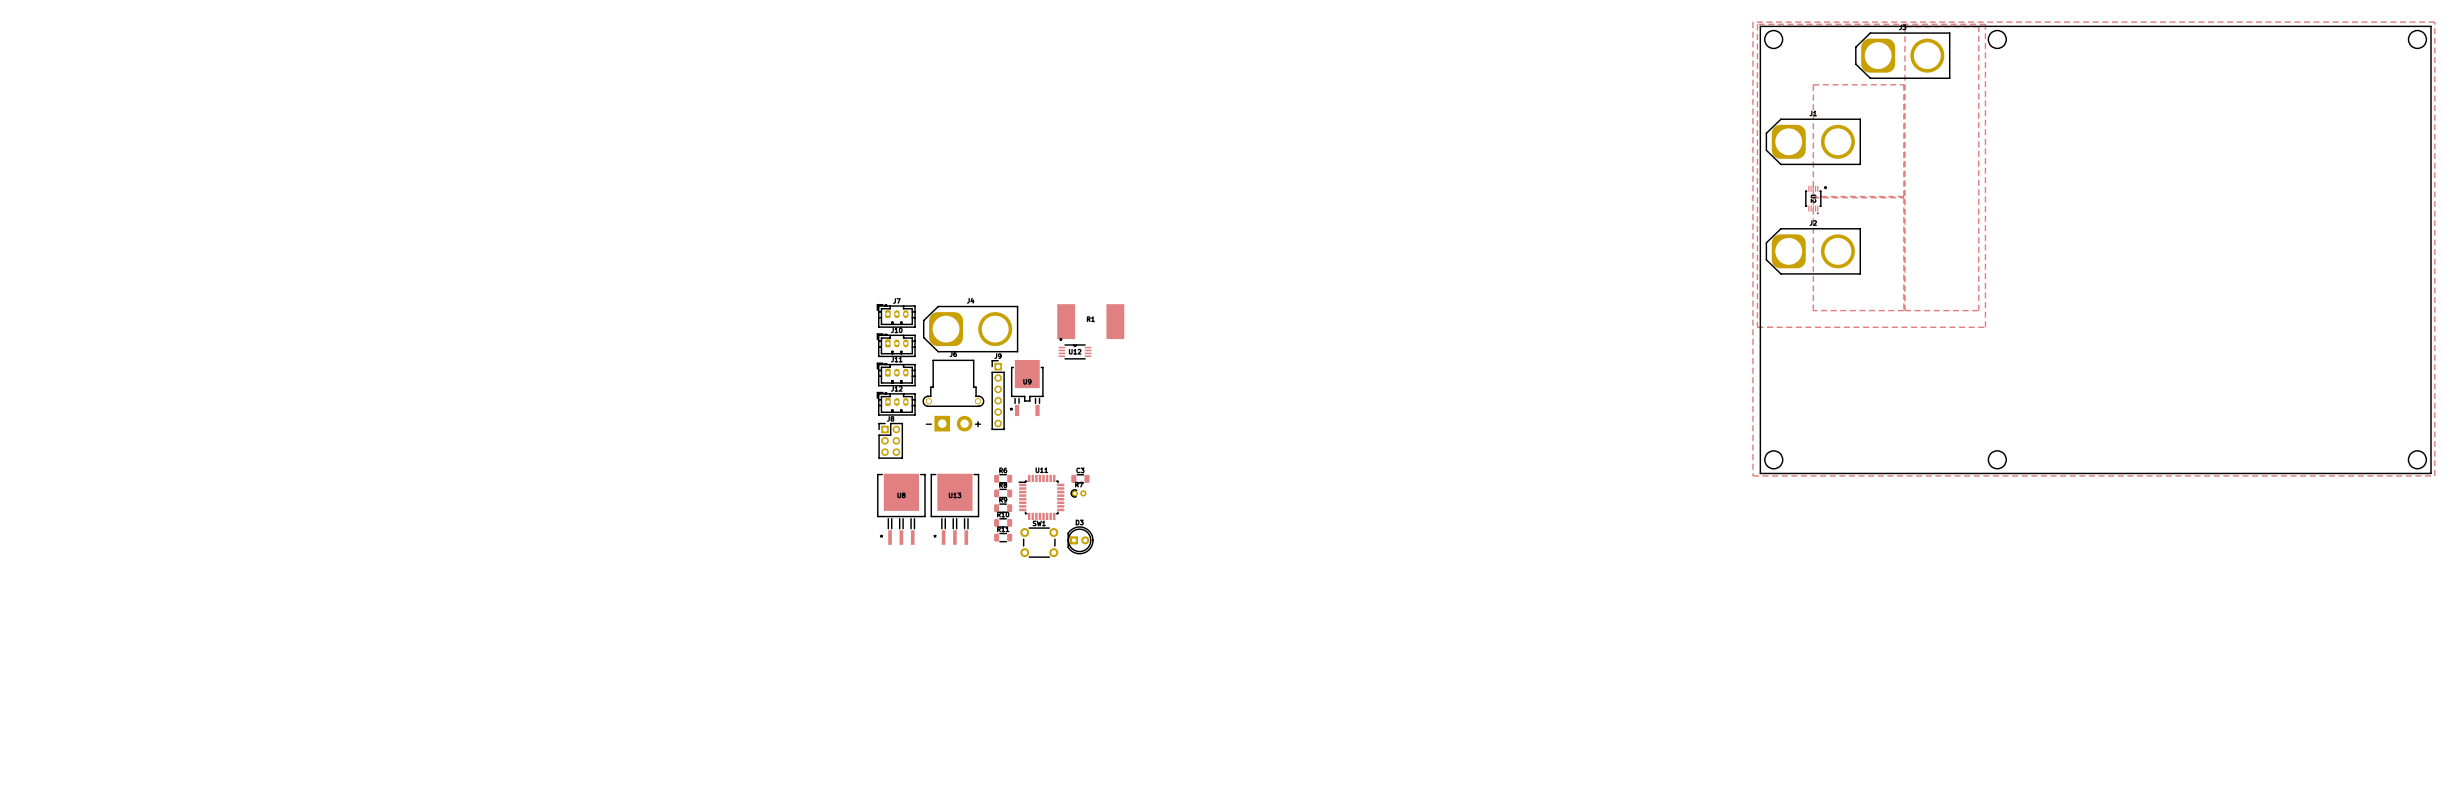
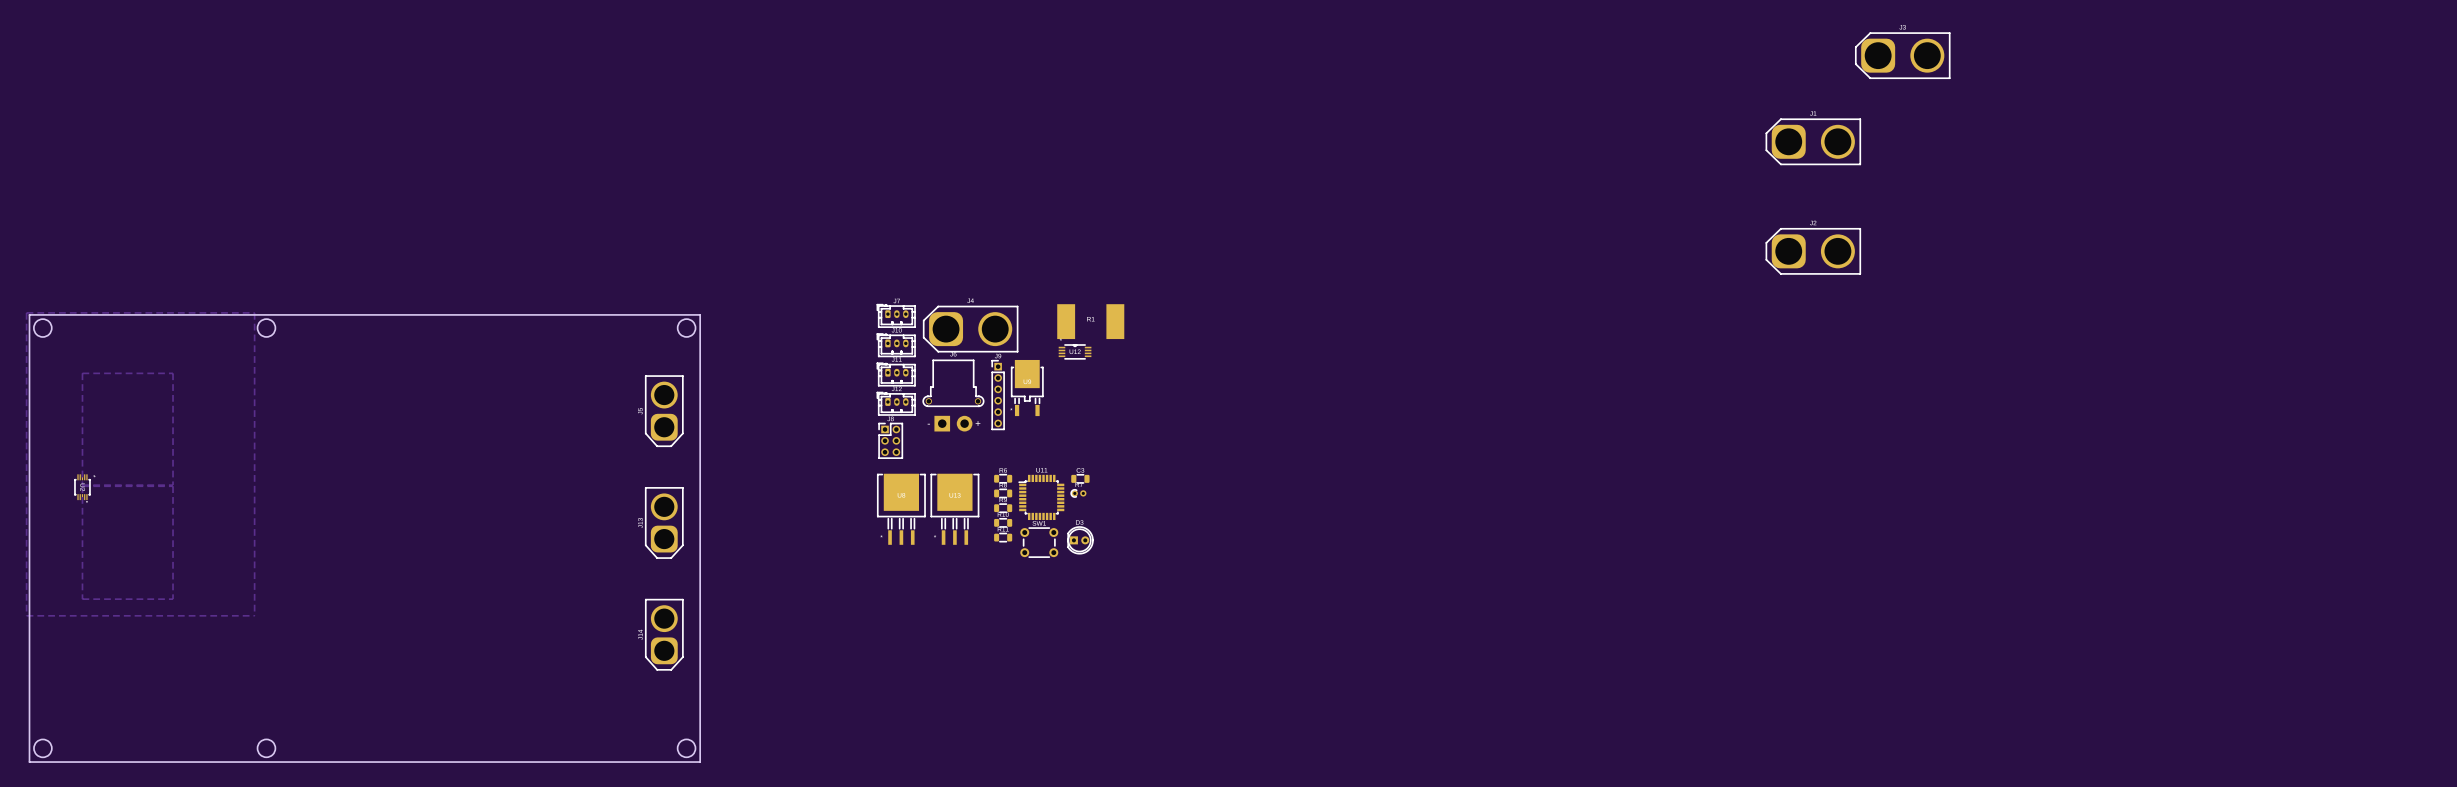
zone outline: (1752, 22) (2434, 22) (2434, 475) (1752, 475) (1752, 22) -> none
zone outline: (1757, 24) (1985, 24) (1985, 327) (1757, 327) (1757, 24) -> none
board edge: (1760, 26) (1760, 473) (2431, 473) (2431, 26) (1760, 26) -> none
zone outline: (1904, 26) (1904, 310) (1978, 310) (1978, 26) (1904, 26) -> none
round board edge: [1764, 30, 1783, 49] -> none
round board edge: [1988, 30, 2007, 49] -> none
round board edge: [2408, 30, 2427, 49] -> none
zone outline: (1813, 84) (1813, 196) (1903, 196) (1903, 84) (1813, 84) -> none
zone outline: (1813, 197) (1903, 197) (1903, 310) (1813, 310) (1813, 197) -> none
part position: (1813, 199) -> (82, 488)
zone outline: none -> (26, 312) (254, 312) (254, 615) (26, 615) (26, 312)
board edge: none -> (29, 314) (29, 762) (700, 762) (700, 314) (29, 314)
round board edge: none -> [33, 318, 52, 338]
round board edge: none -> [257, 318, 276, 338]
round board edge: none -> [677, 318, 696, 338]
zone outline: none -> (82, 373) (82, 485) (173, 485) (173, 373) (82, 373)
part: none -> (664, 411)
round board edge: [1764, 450, 1783, 470] -> none
round board edge: [1988, 450, 2007, 469] -> none
round board edge: [2408, 450, 2427, 469] -> none
zone outline: none -> (82, 486) (173, 486) (173, 599) (82, 599) (82, 486)
part: none -> (664, 522)
part: none -> (664, 634)
round board edge: none -> [33, 739, 53, 758]
round board edge: none -> [257, 739, 276, 758]
round board edge: none -> [677, 739, 696, 758]

